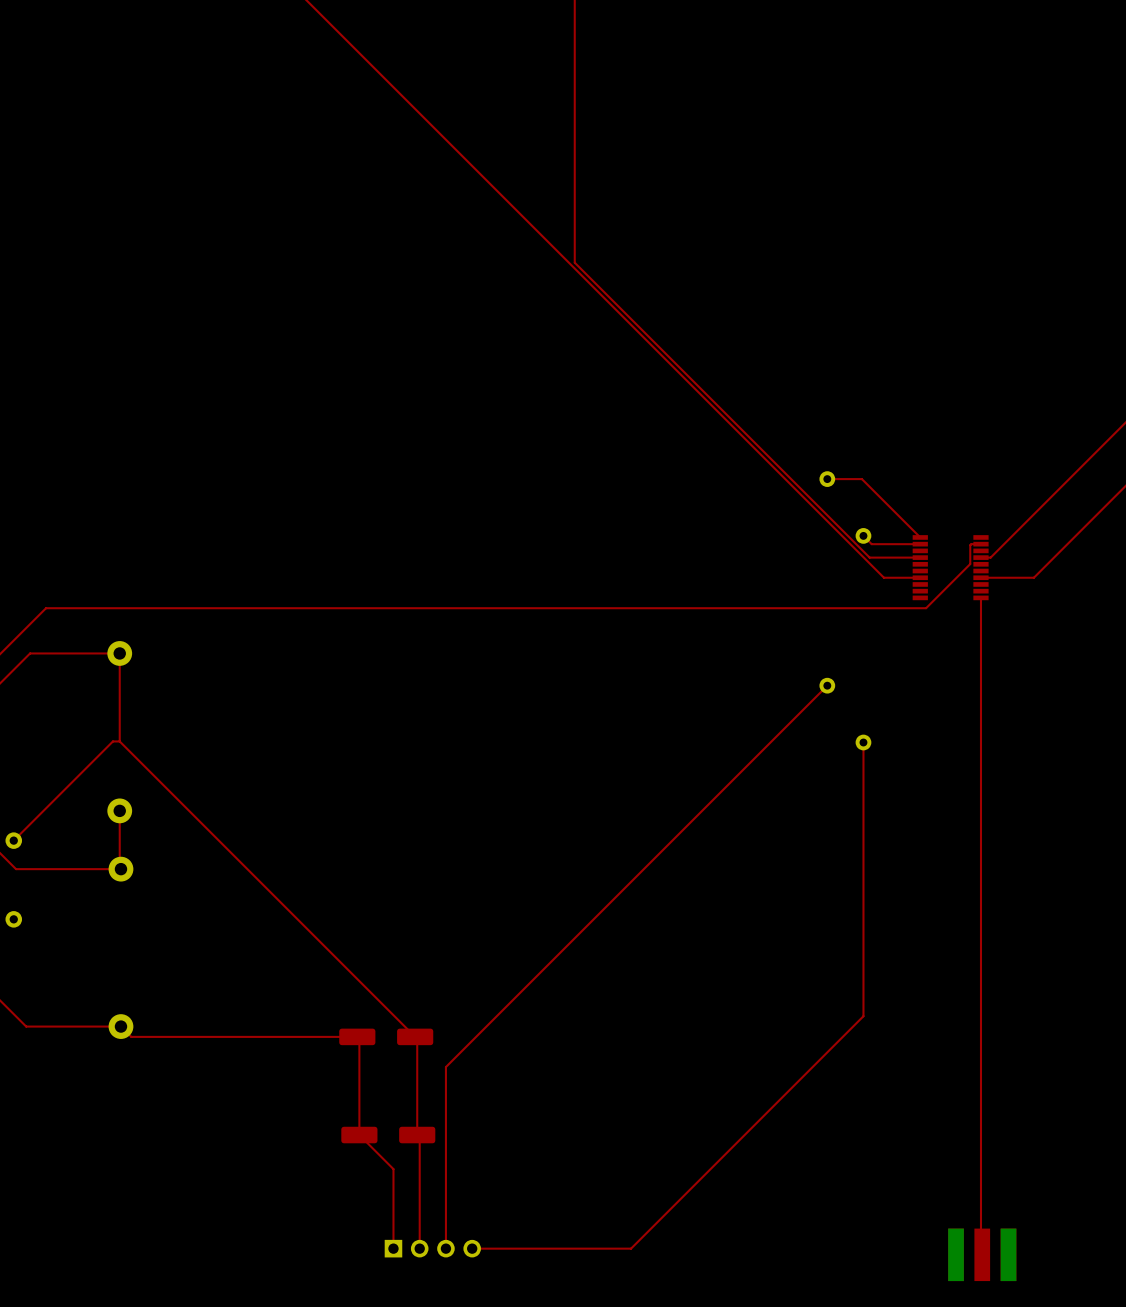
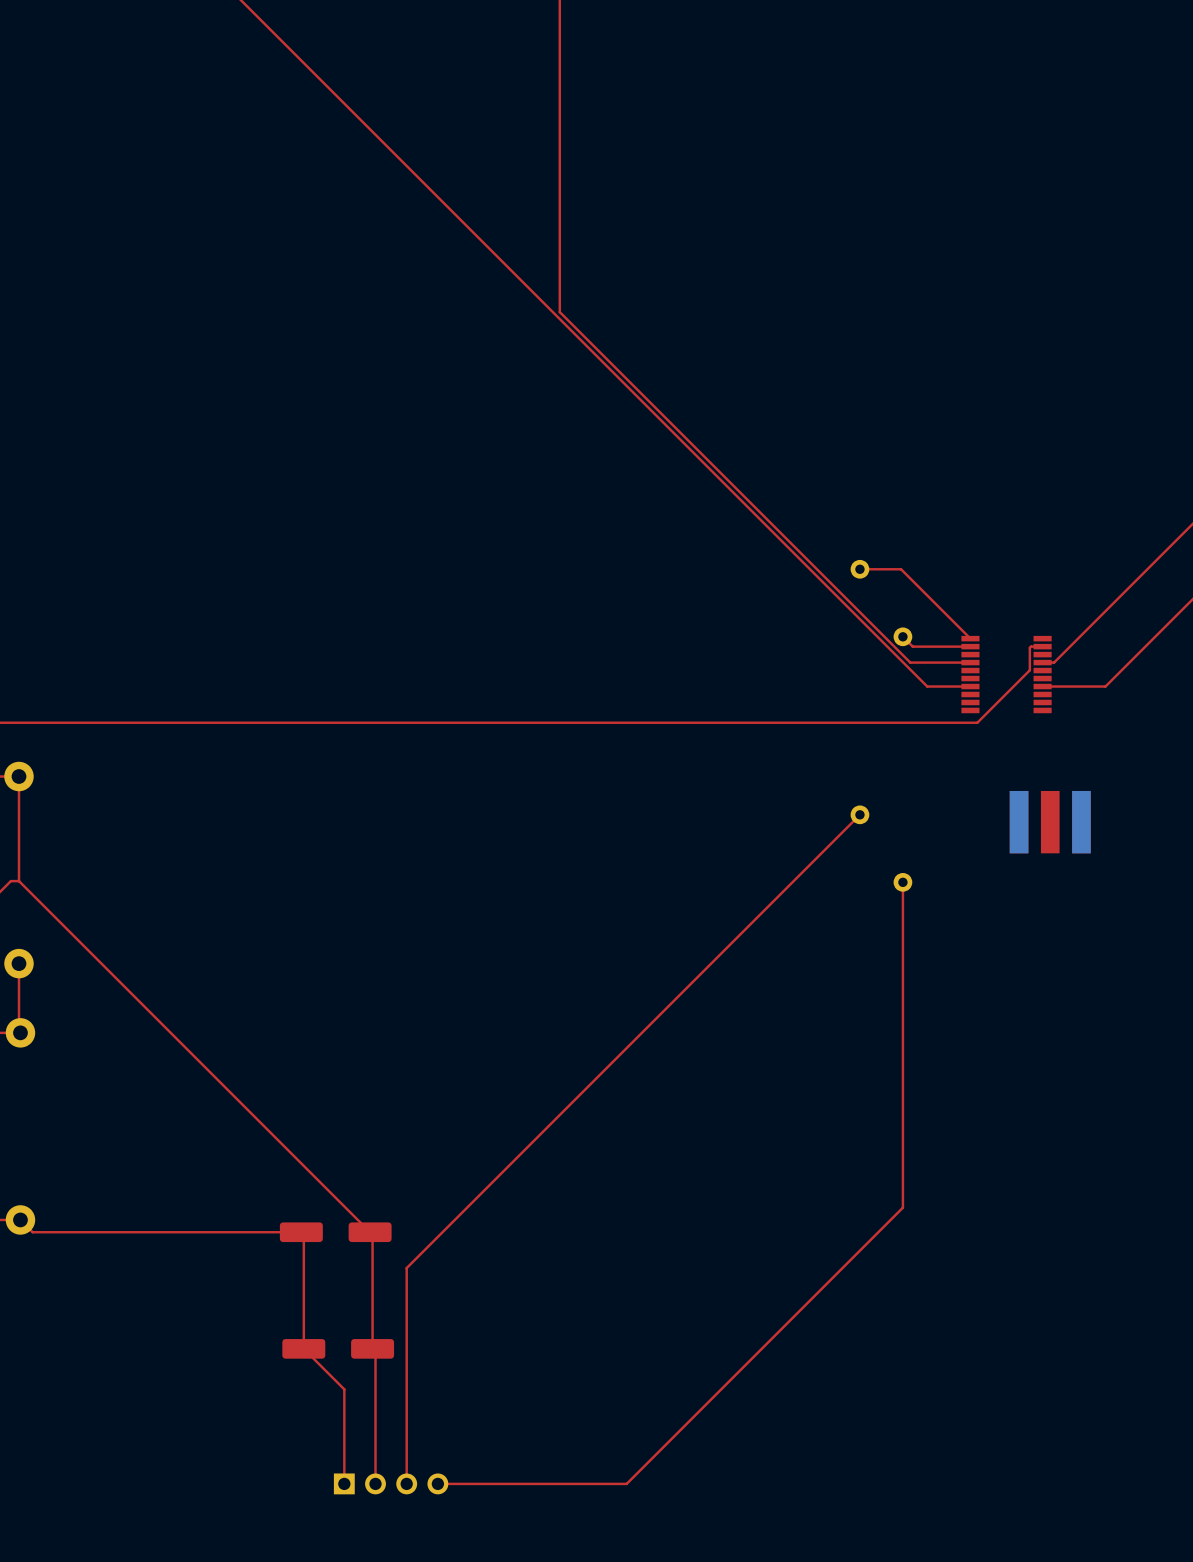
top track: (980, 597) (982, 1254) -> none
part: none -> (1050, 822)
part: (982, 1254) -> none

